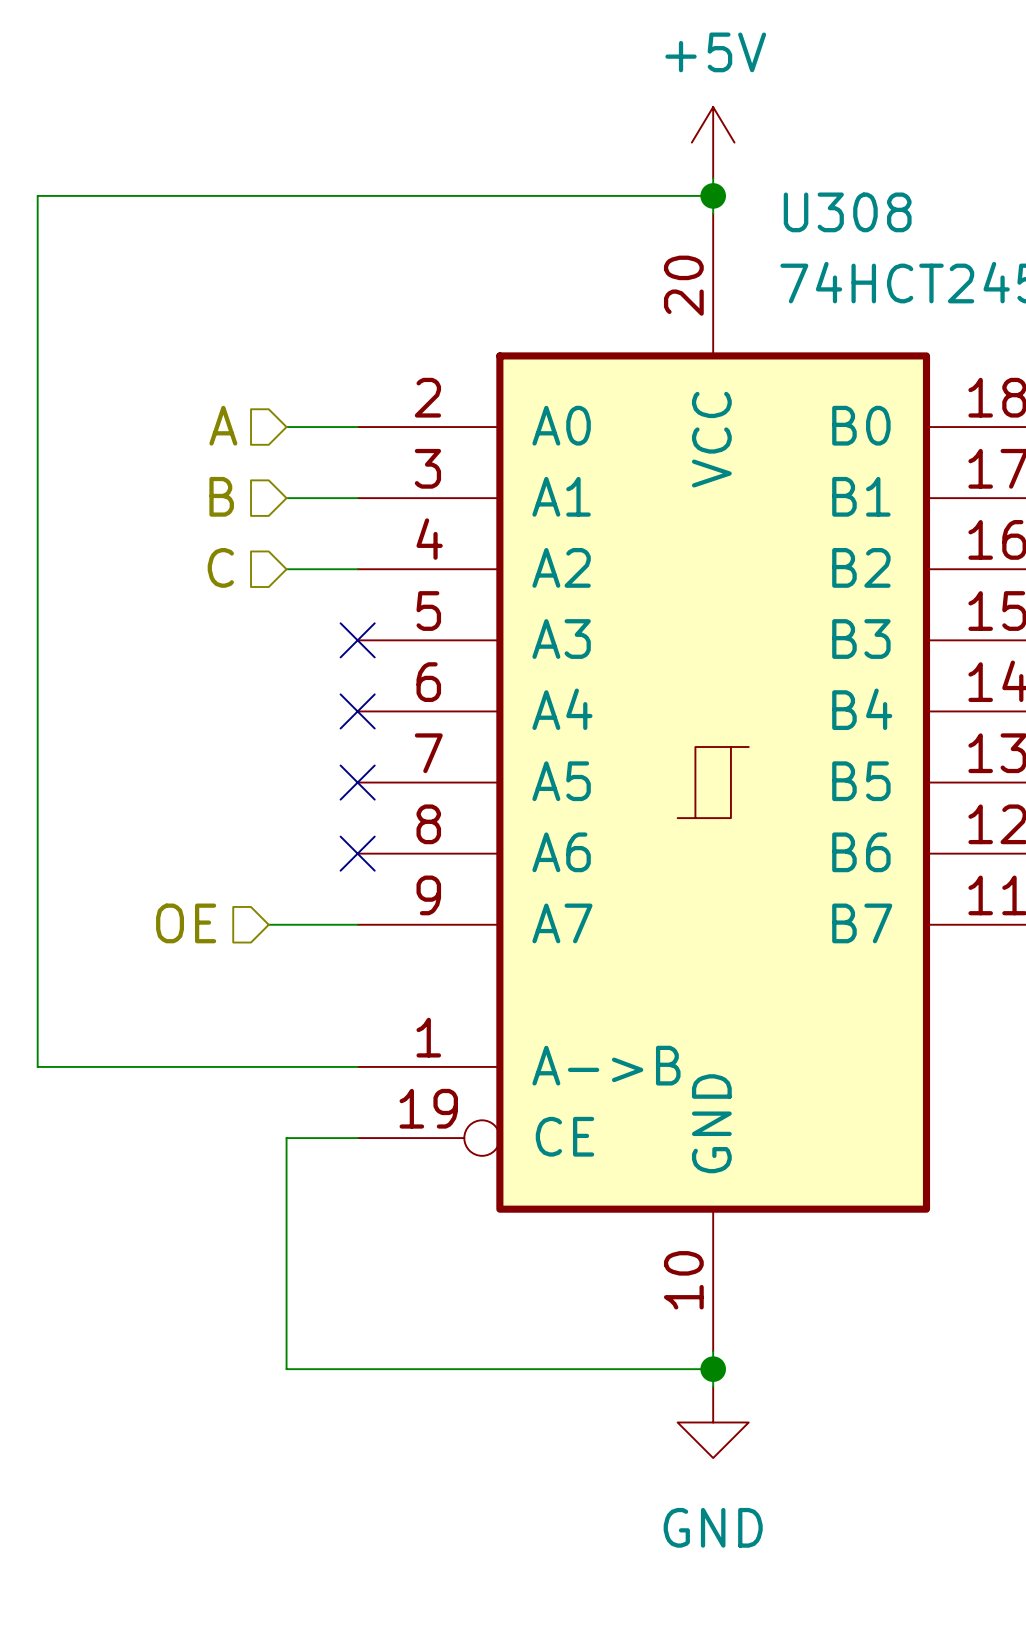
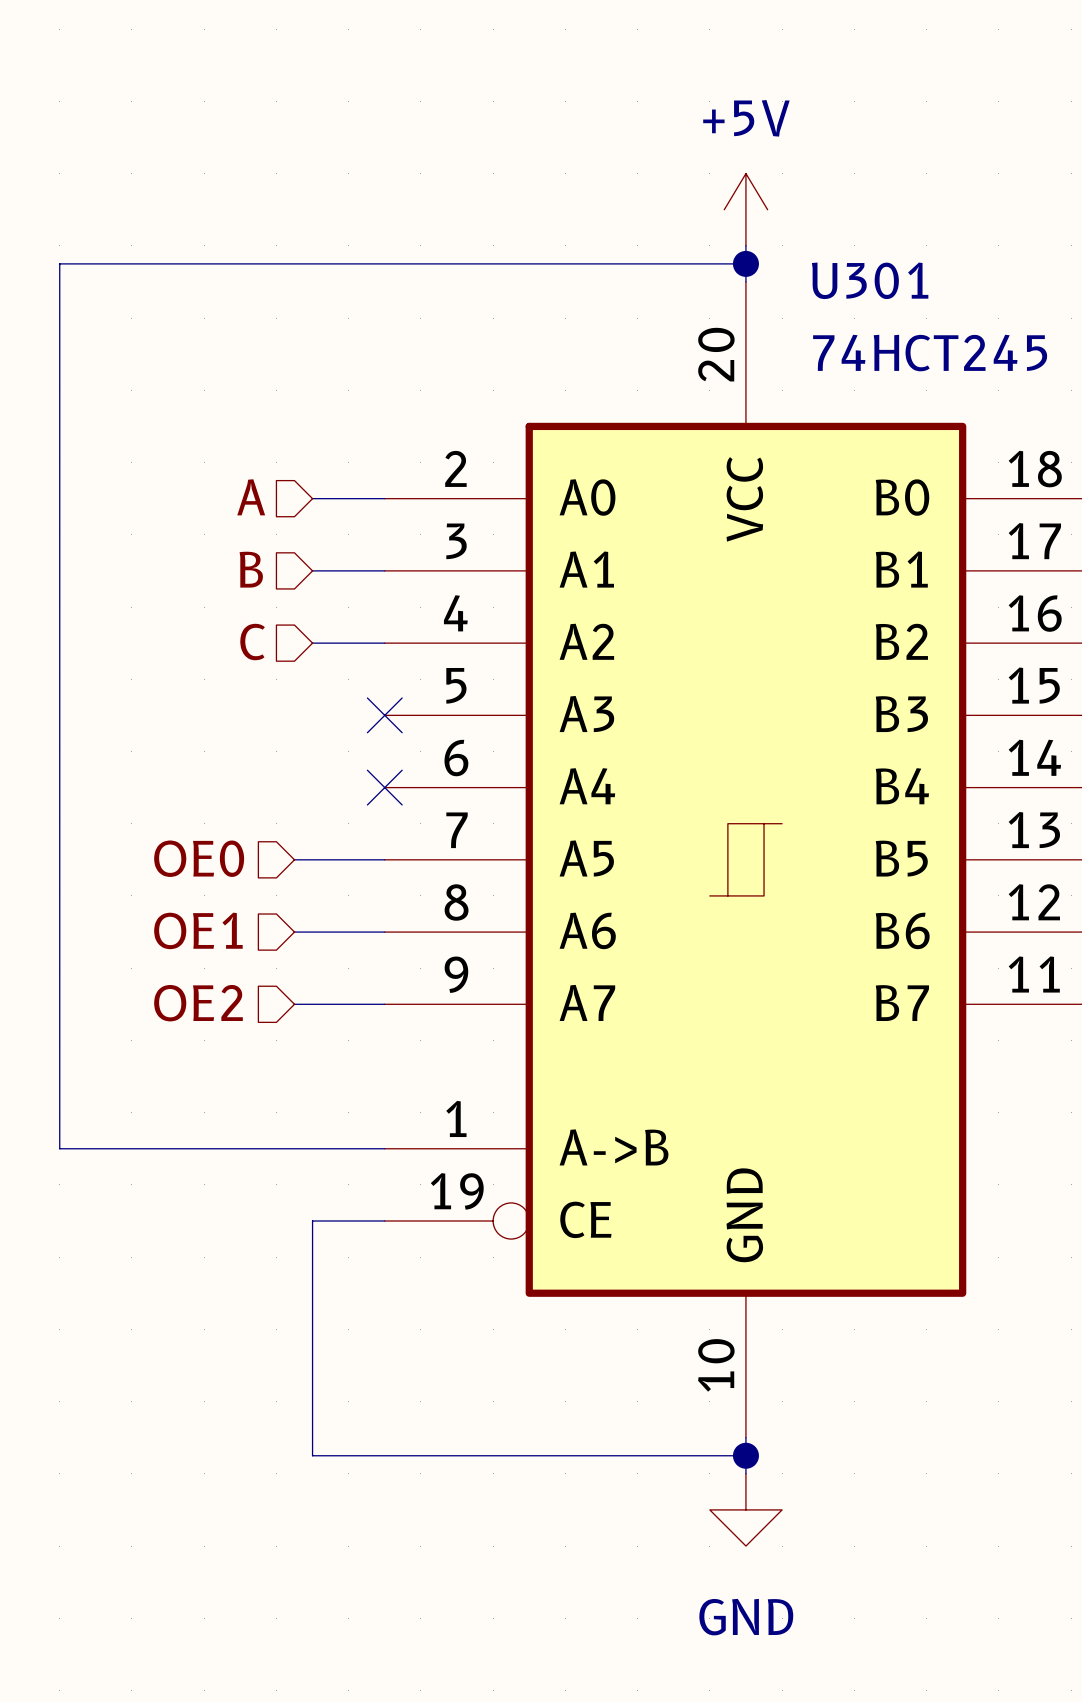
U308 name: U308 (847, 212) -> U301 (870, 280)
hierarchical label: none -> OE0 (199, 858)
wire: none -> (294, 859) (384, 859)
no-connect mark: (357, 782) -> none
hierarchical label: none -> OE1 (198, 930)
wire: none -> (294, 932) (384, 932)
no-connect mark: (357, 853) -> none
hierarchical label: OE (186, 923) -> OE2 (198, 1003)

